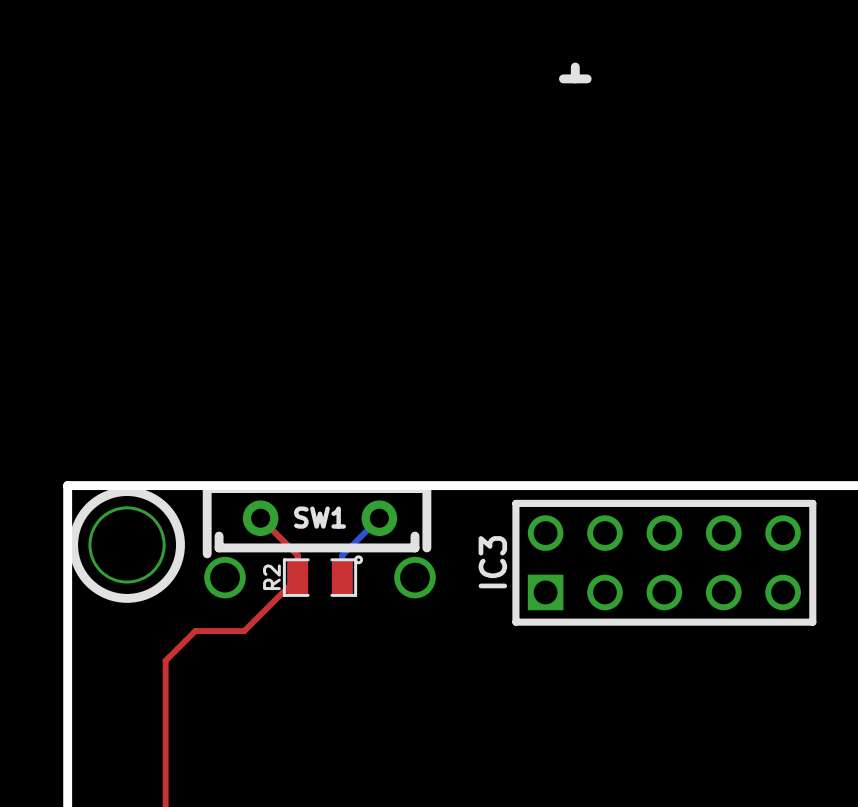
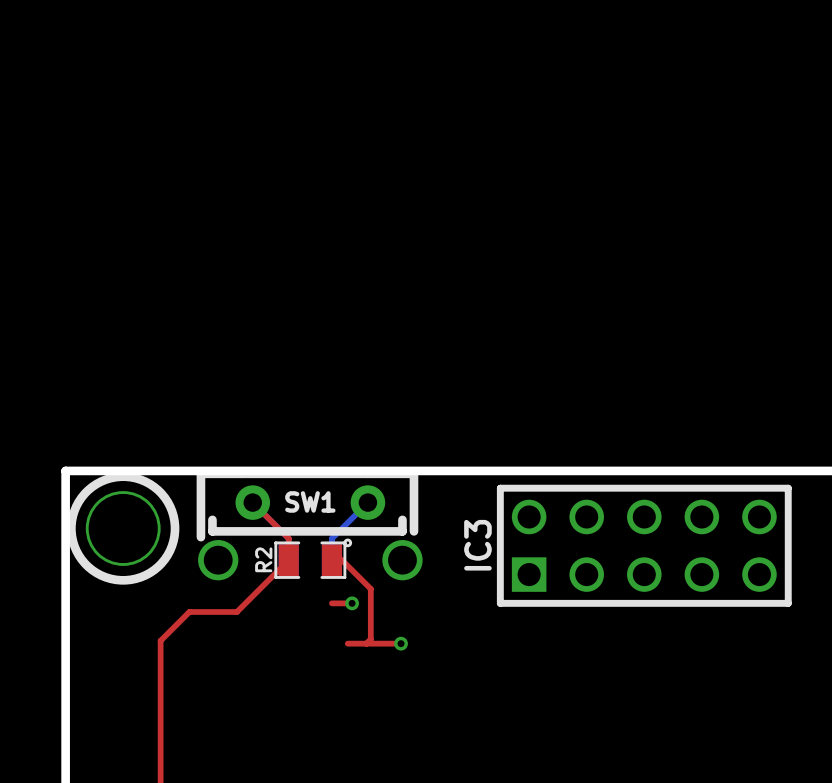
line: (575, 67) (575, 78) -> none
line: (563, 78) (587, 78) -> none
top track: none -> (331, 560) (342, 560) (370, 588) (370, 639) (366, 643)
top track: none -> (331, 603) (352, 603)
via: none -> (352, 603)
top track: none -> (347, 643) (401, 643)
via: none -> (401, 643)

